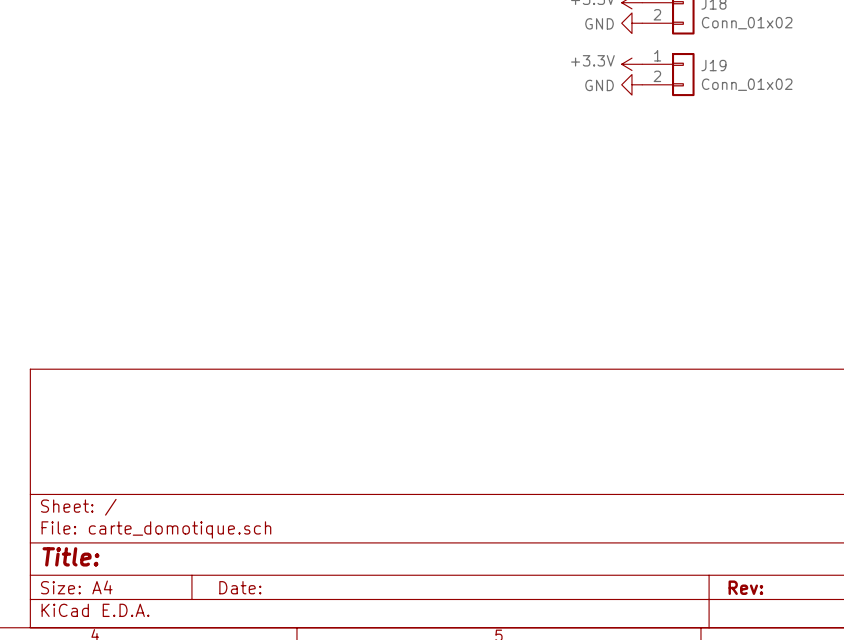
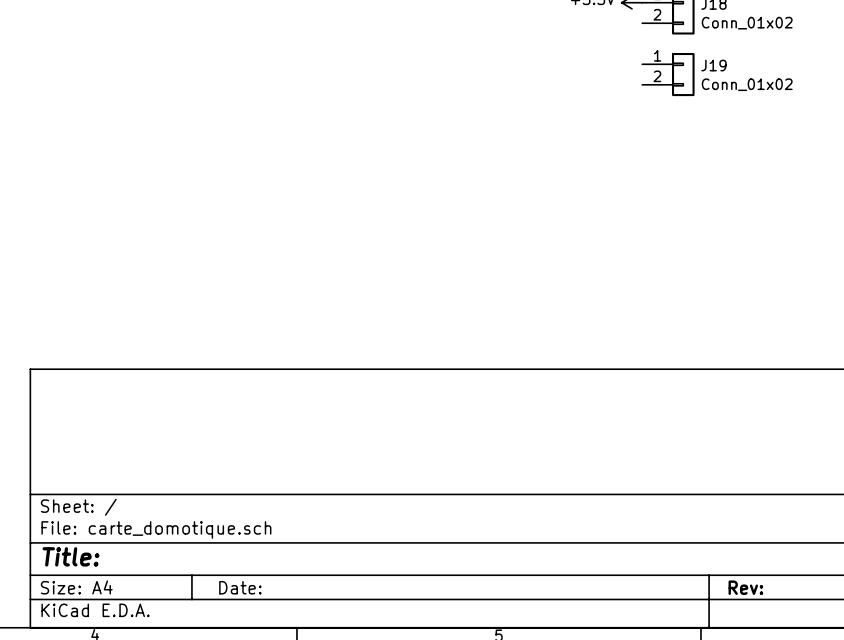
power symbol: GND (631, 23) -> none
power symbol: +3.3V (631, 64) -> none
power symbol: GND (631, 84) -> none

